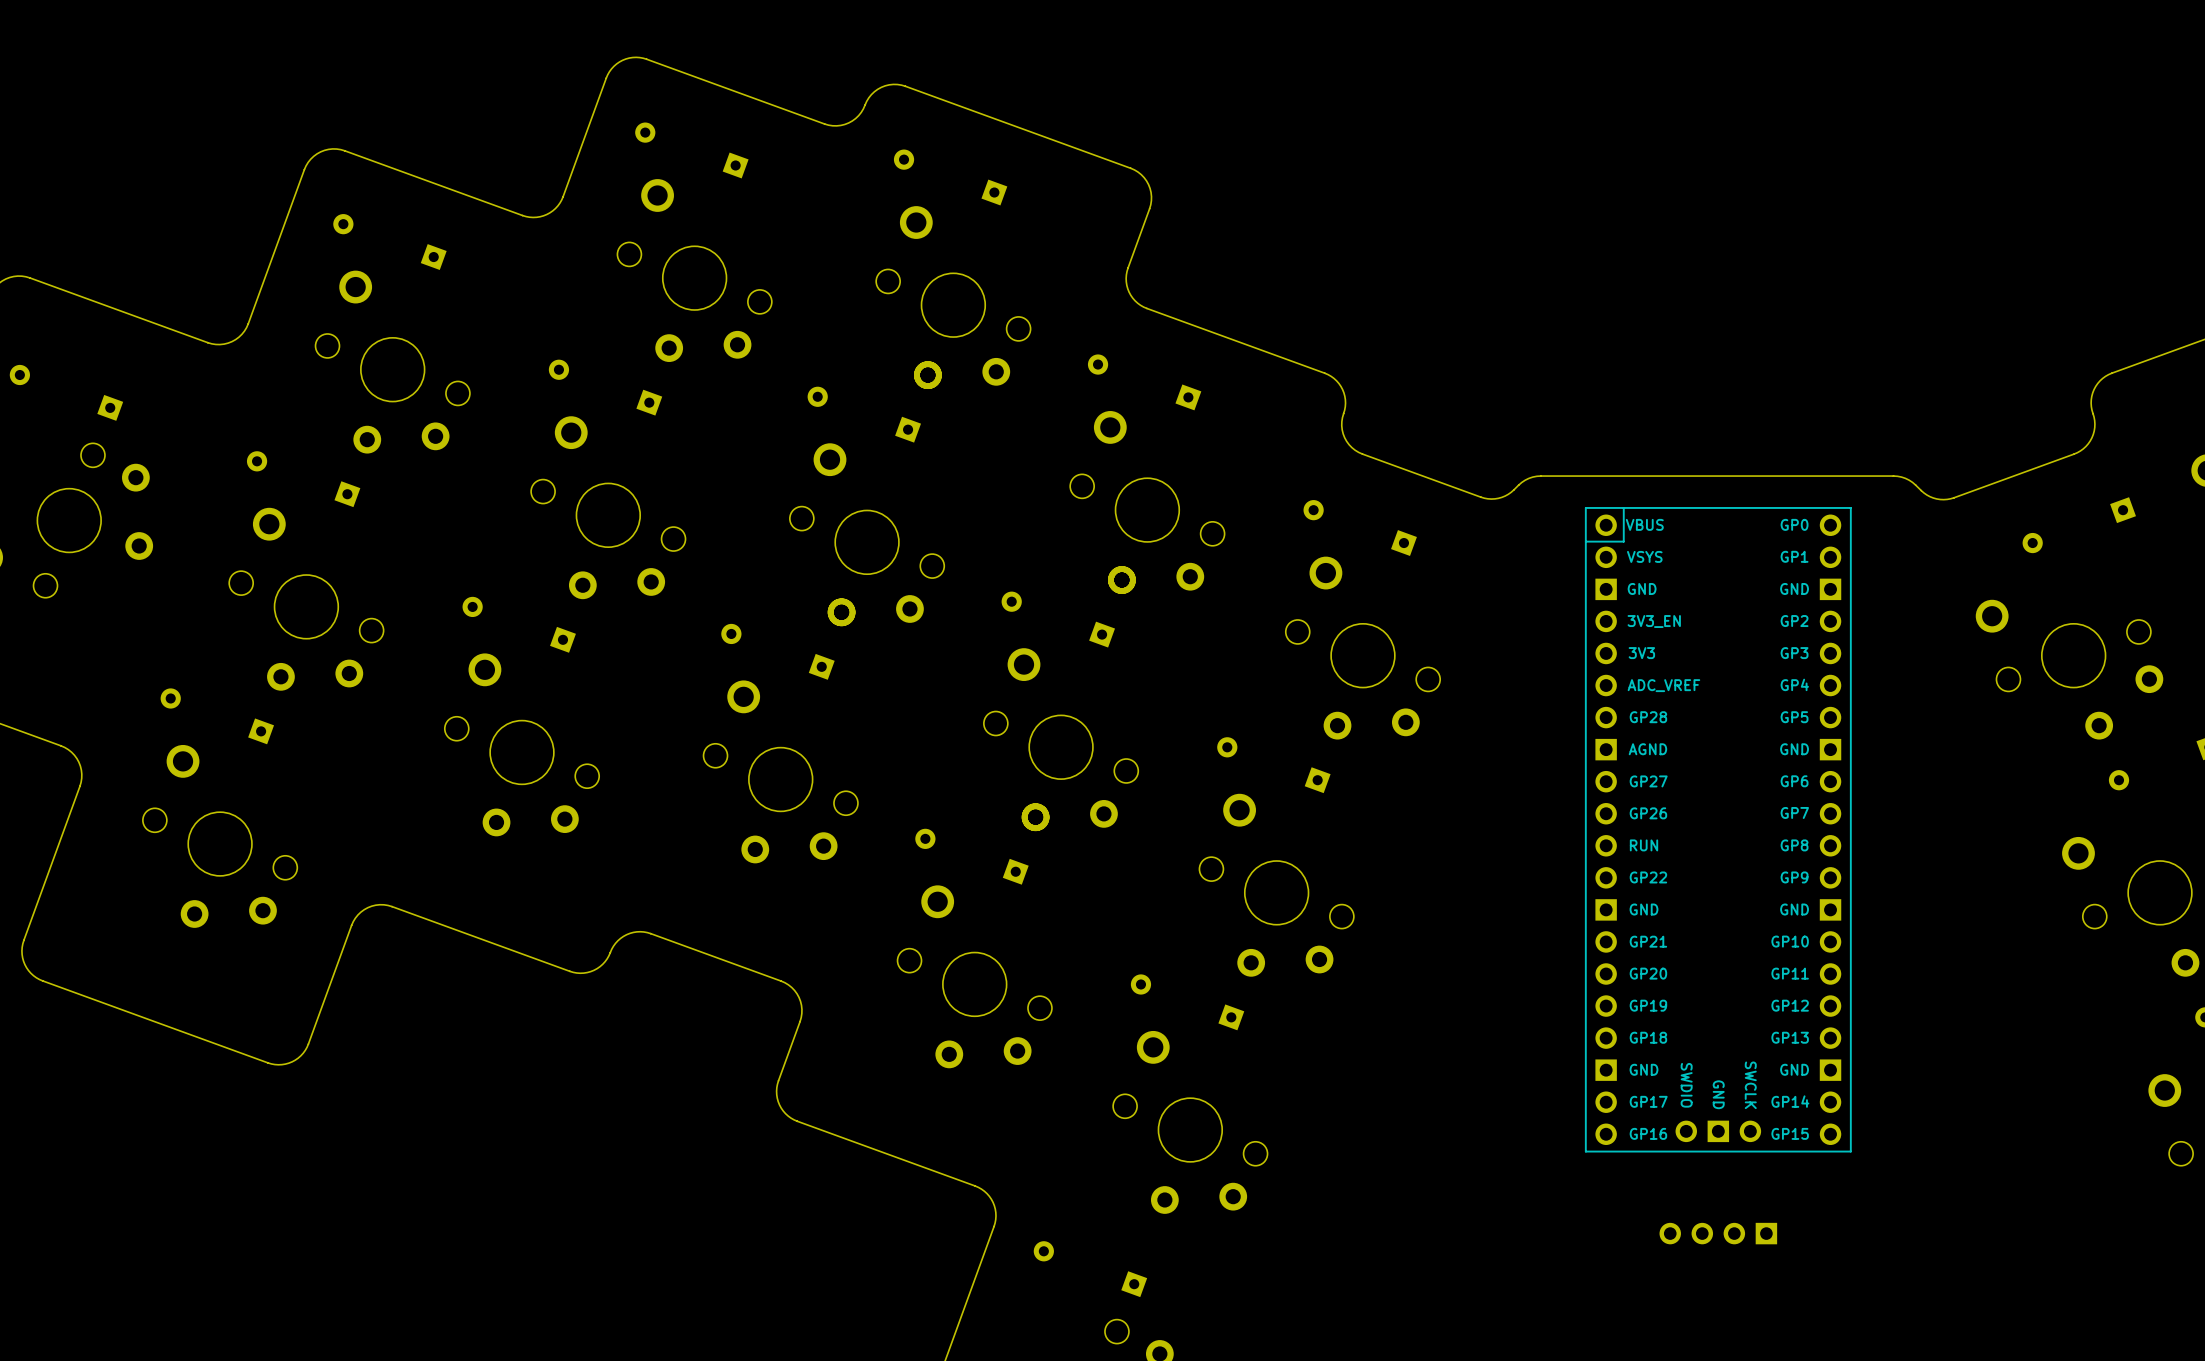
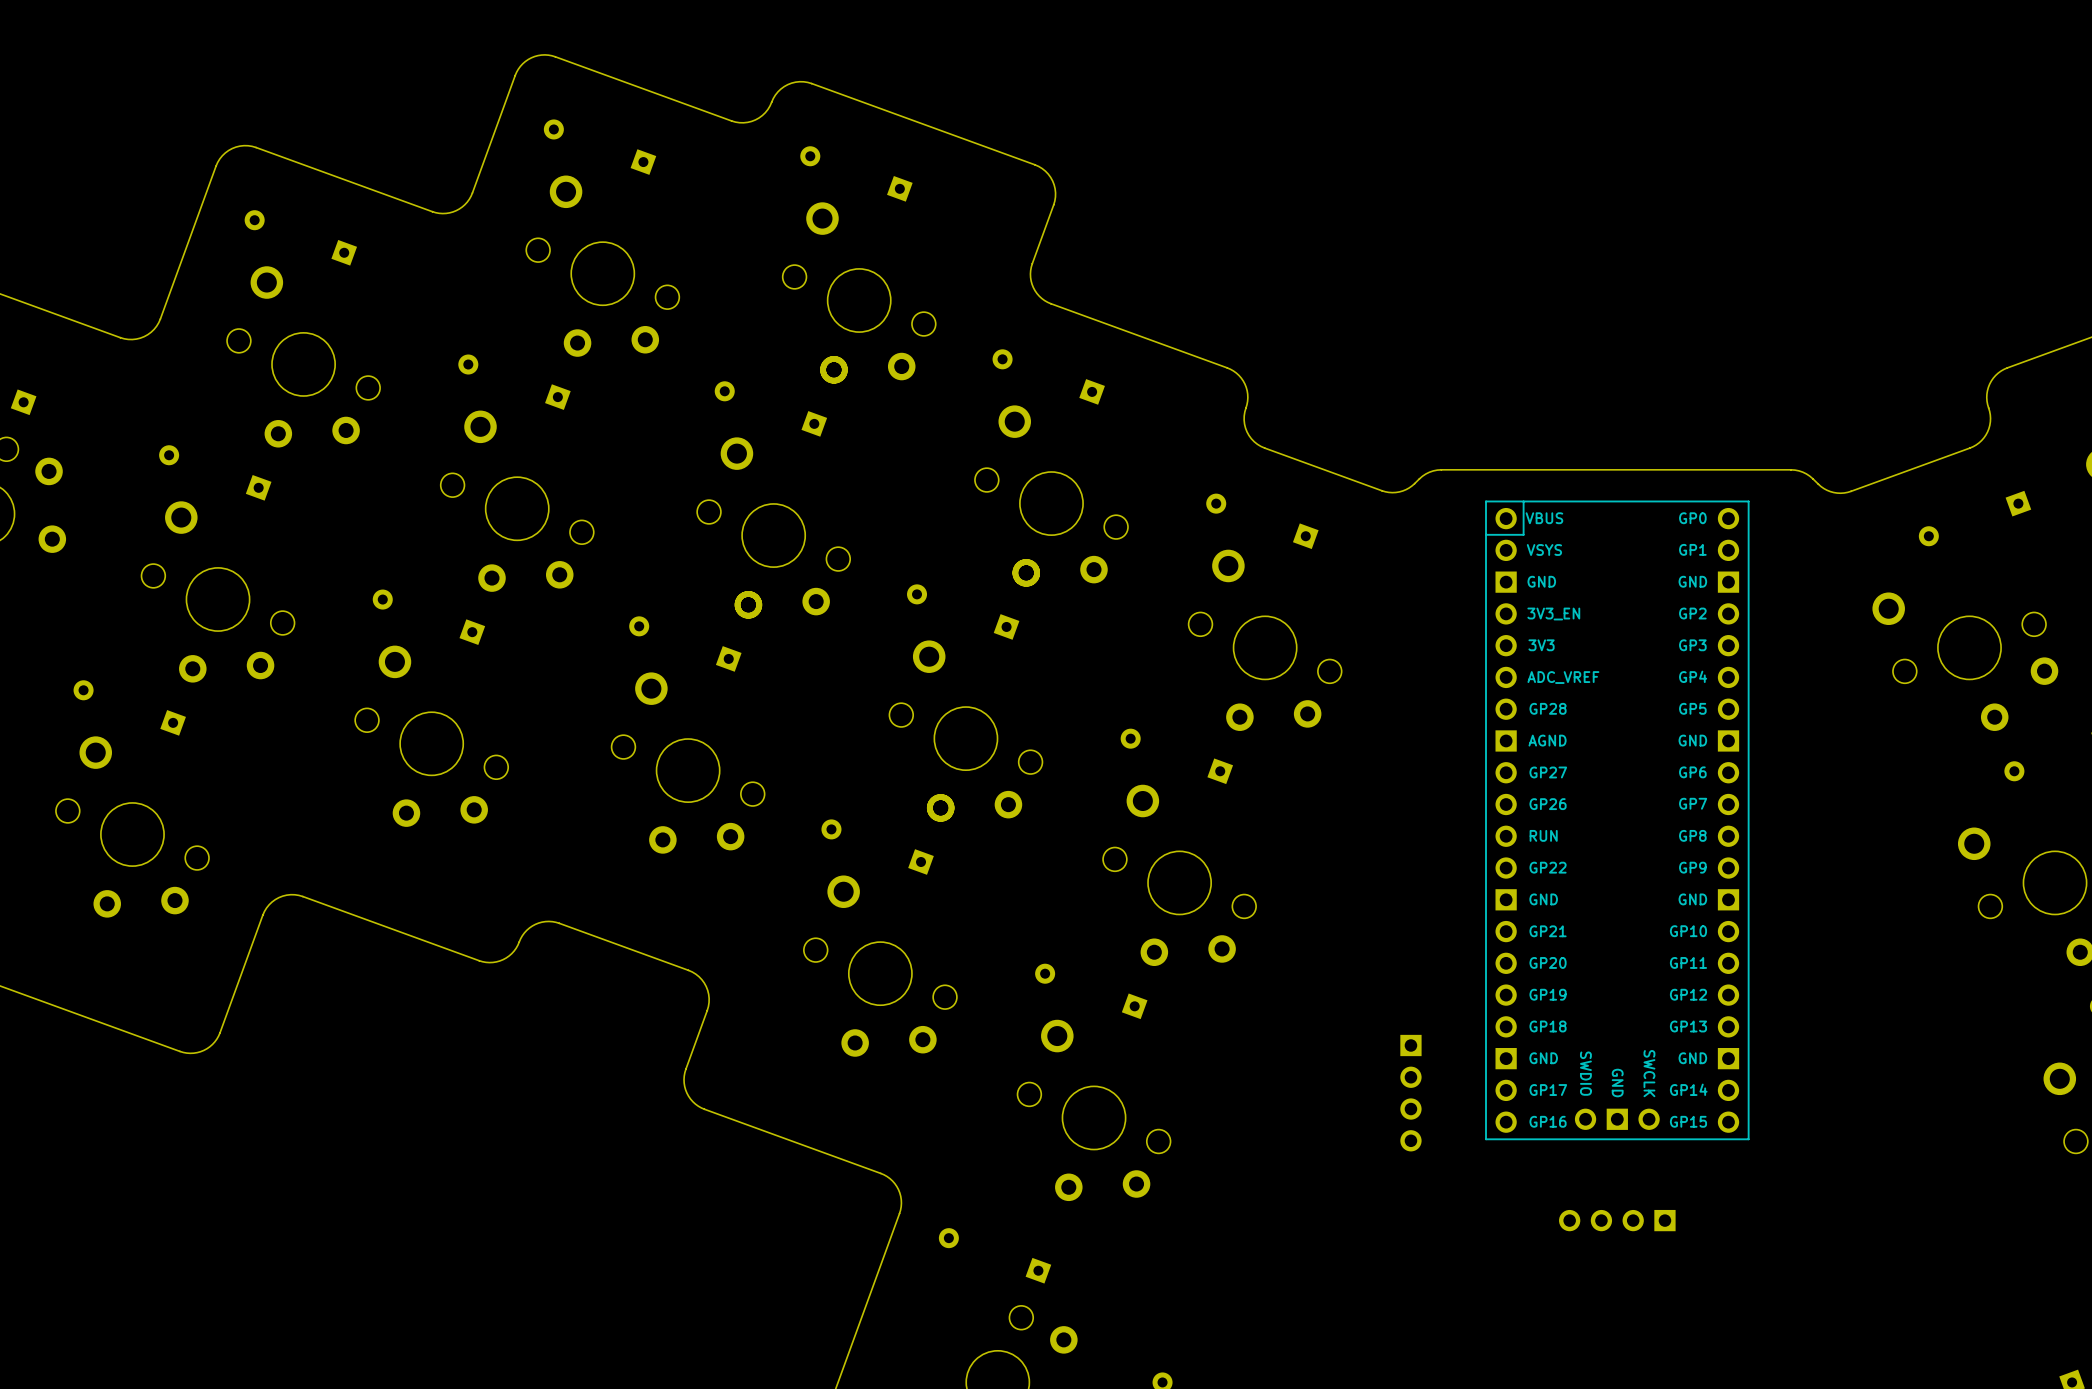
part: none -> (1410, 1093)

